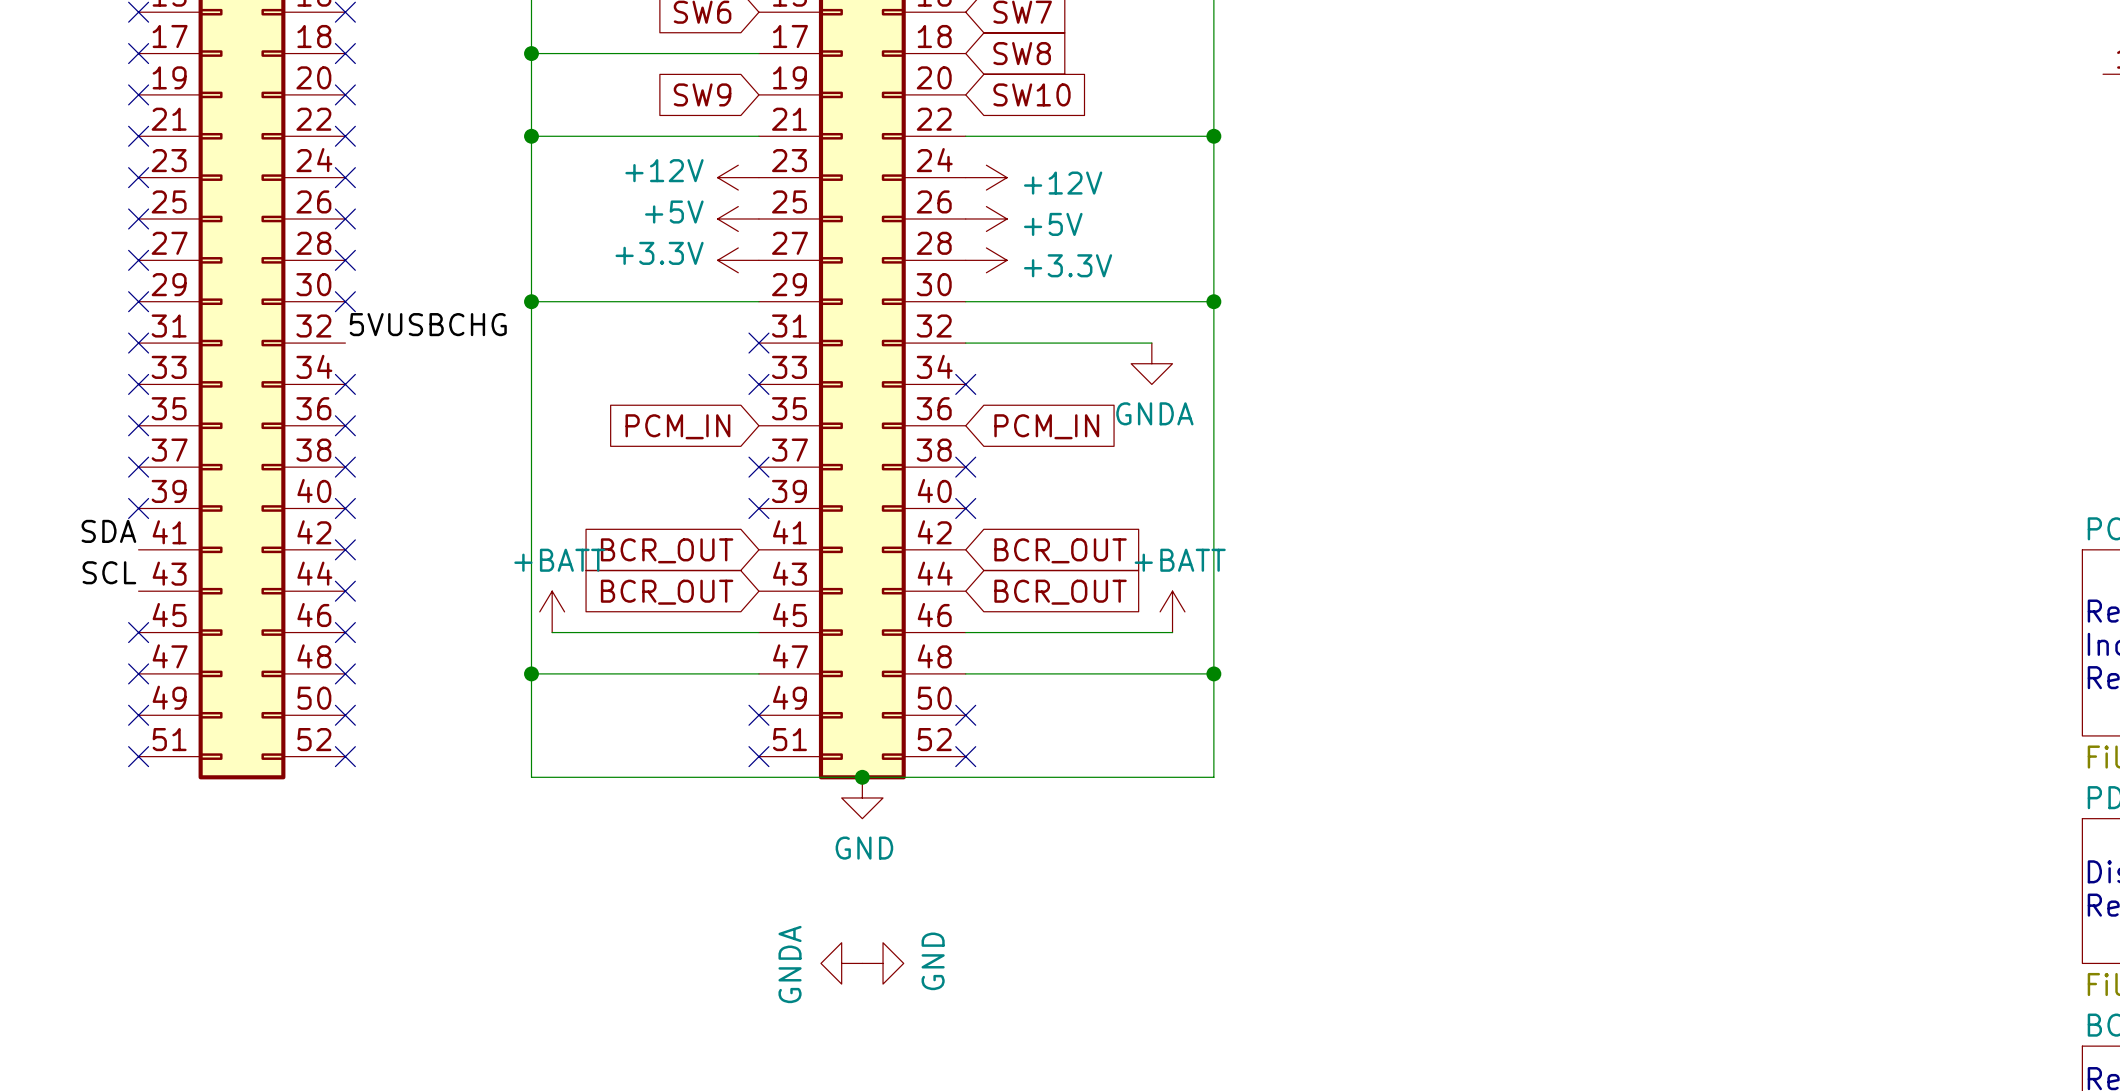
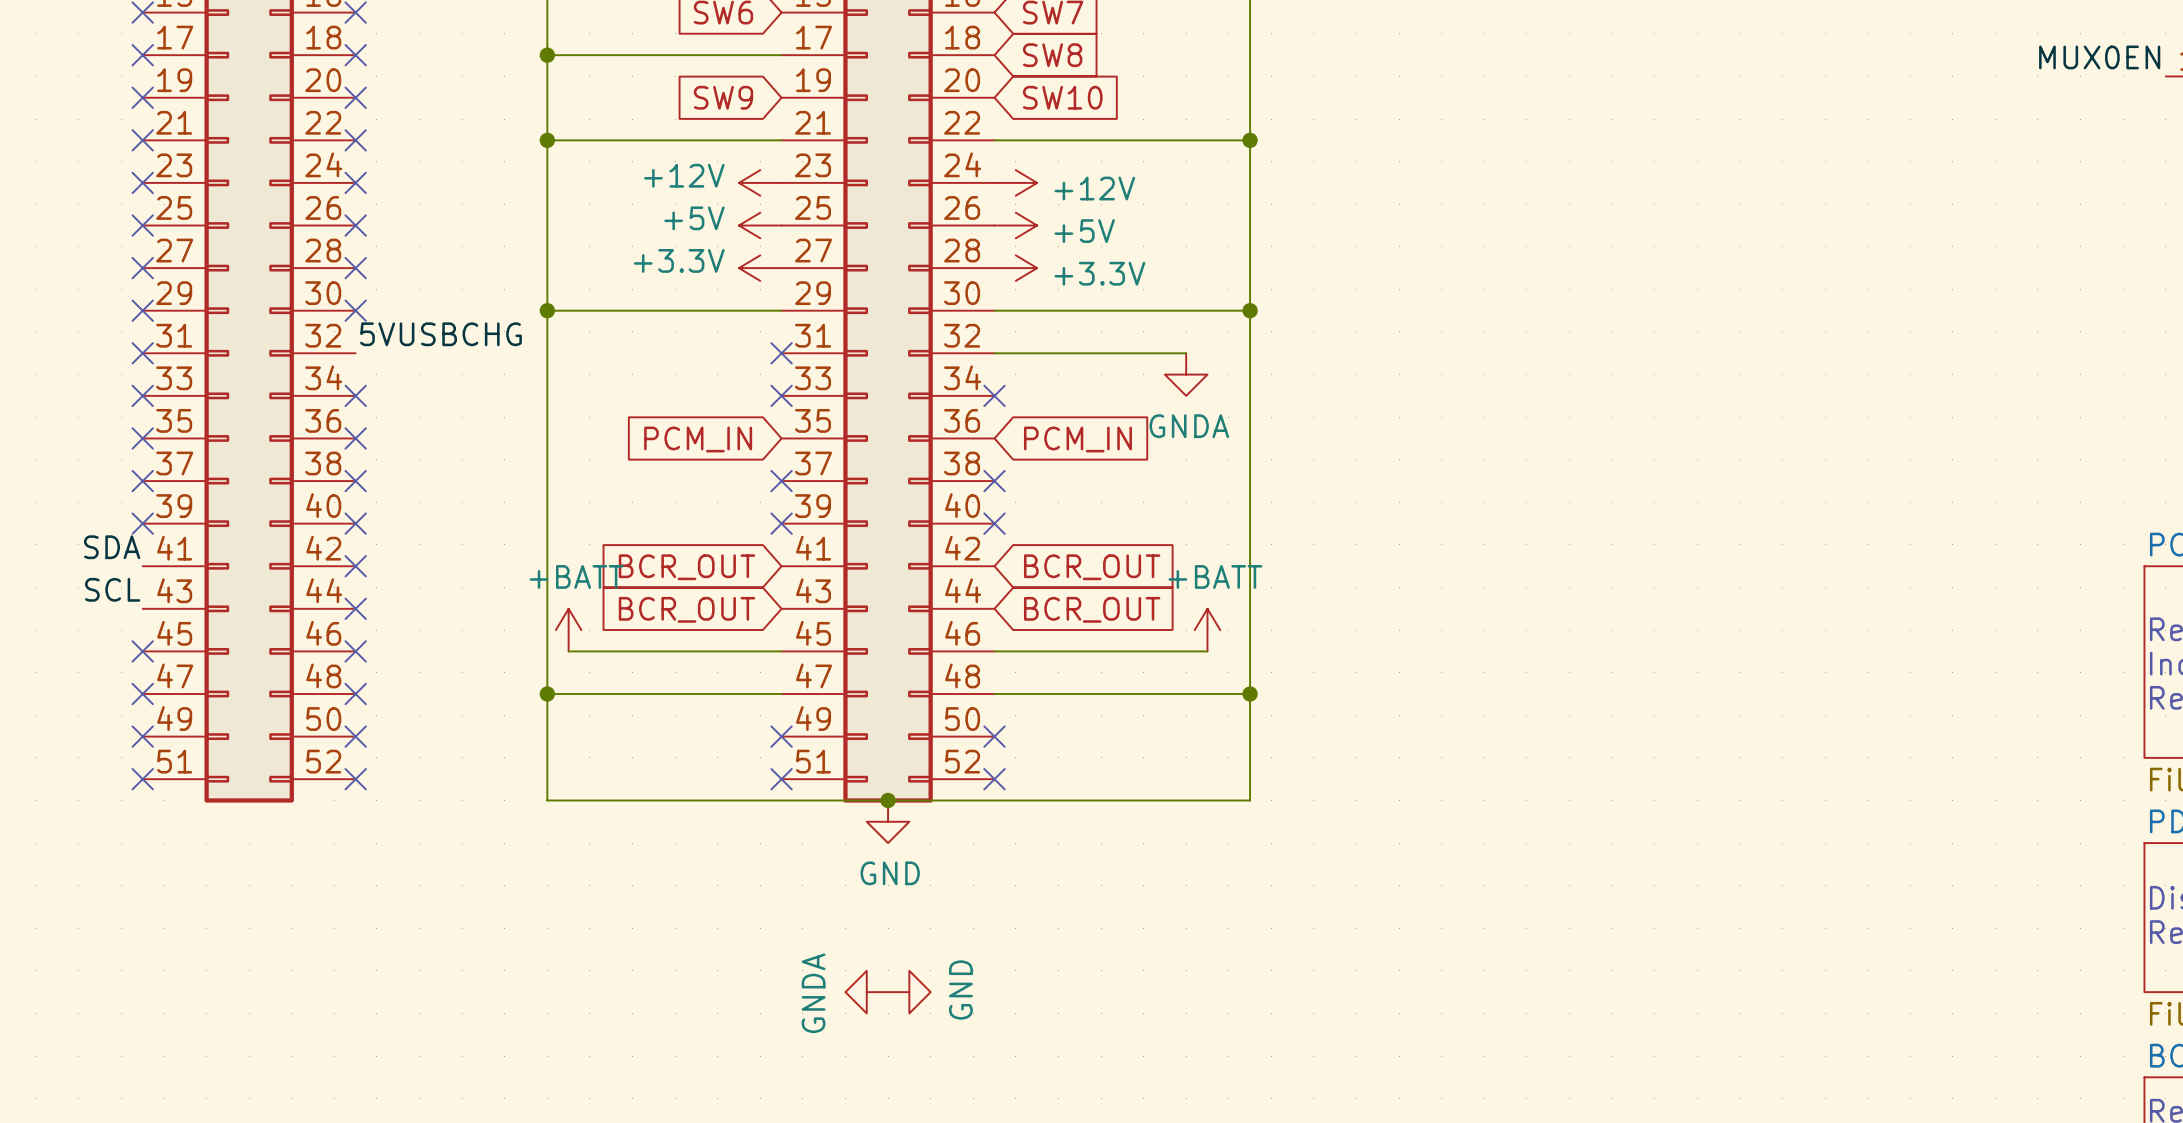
label: none -> MUX0EN (2099, 57)

